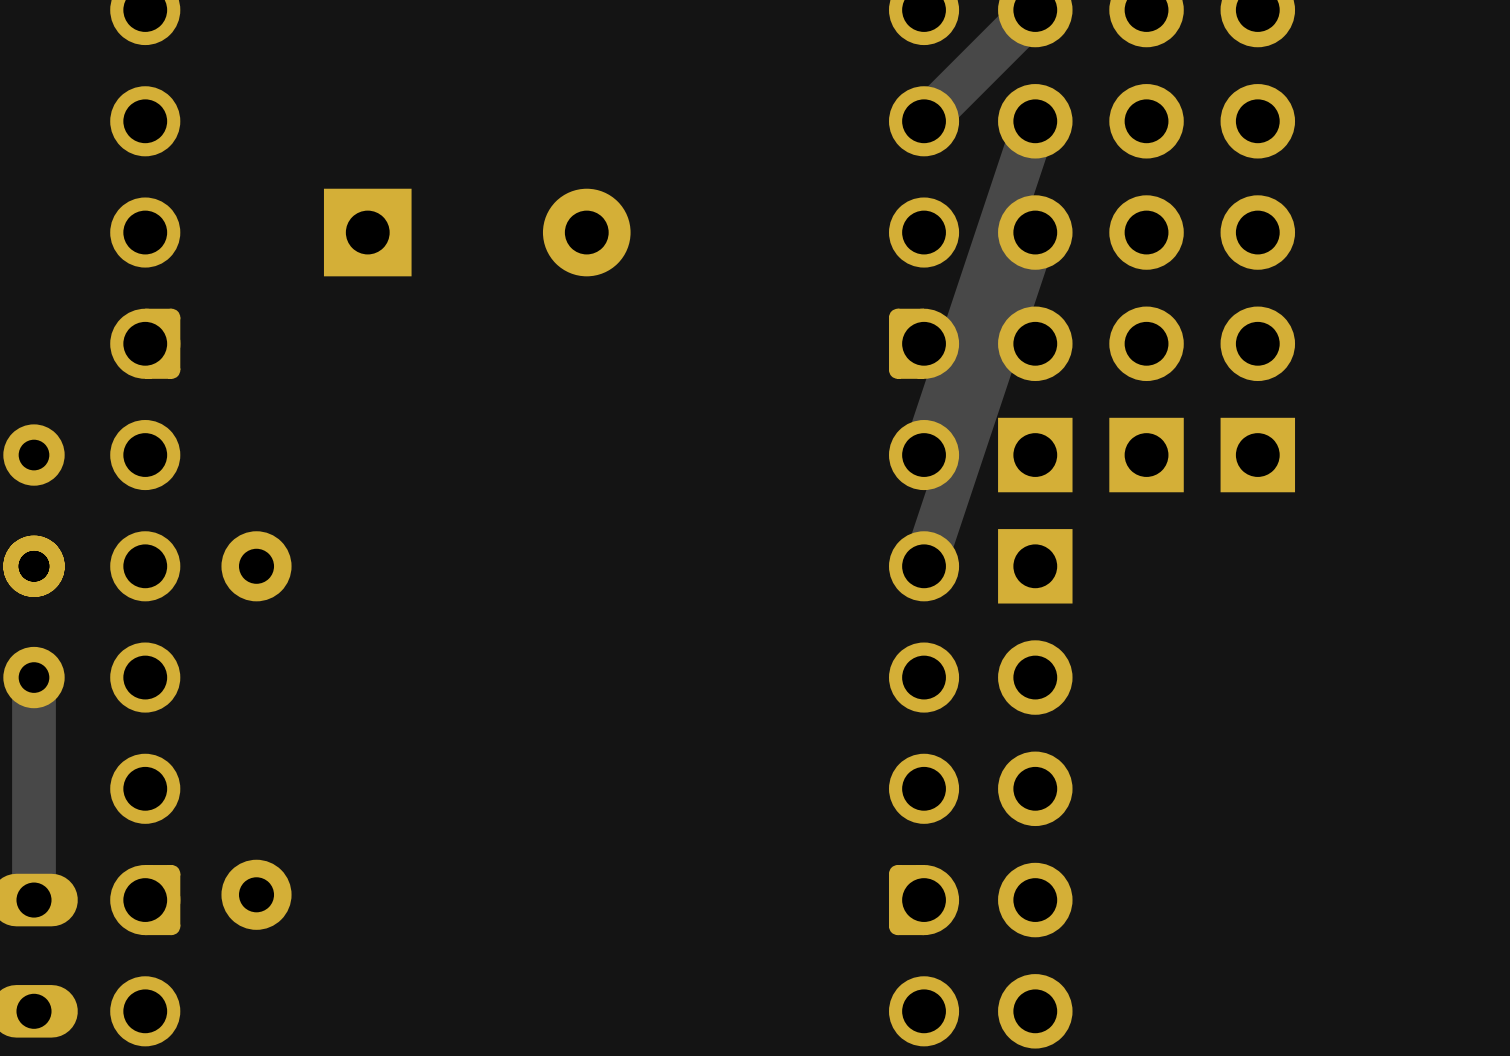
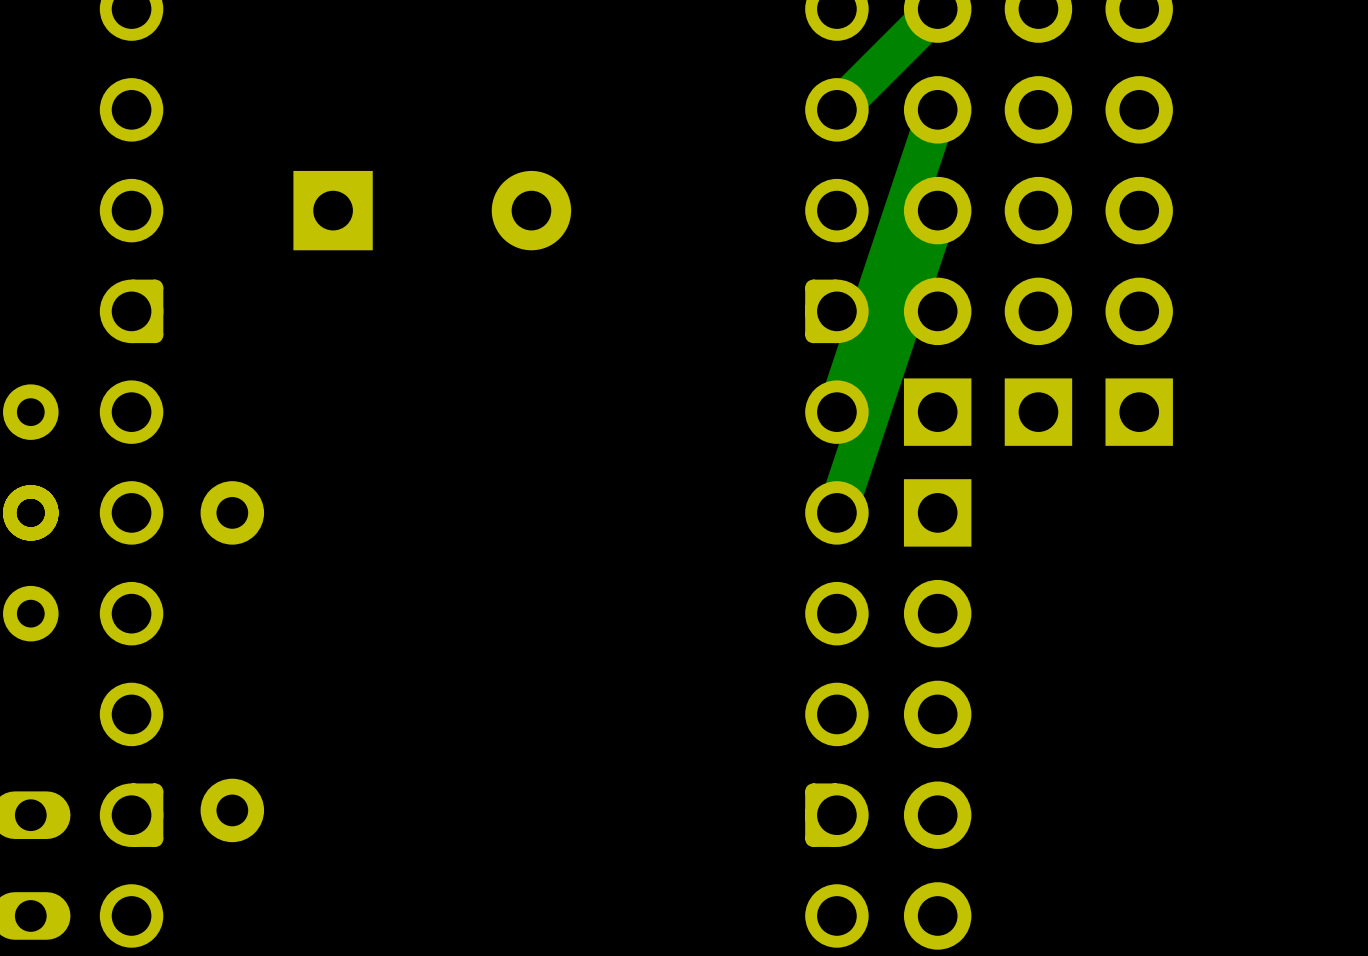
track: (34, 677) (34, 900) -> none

